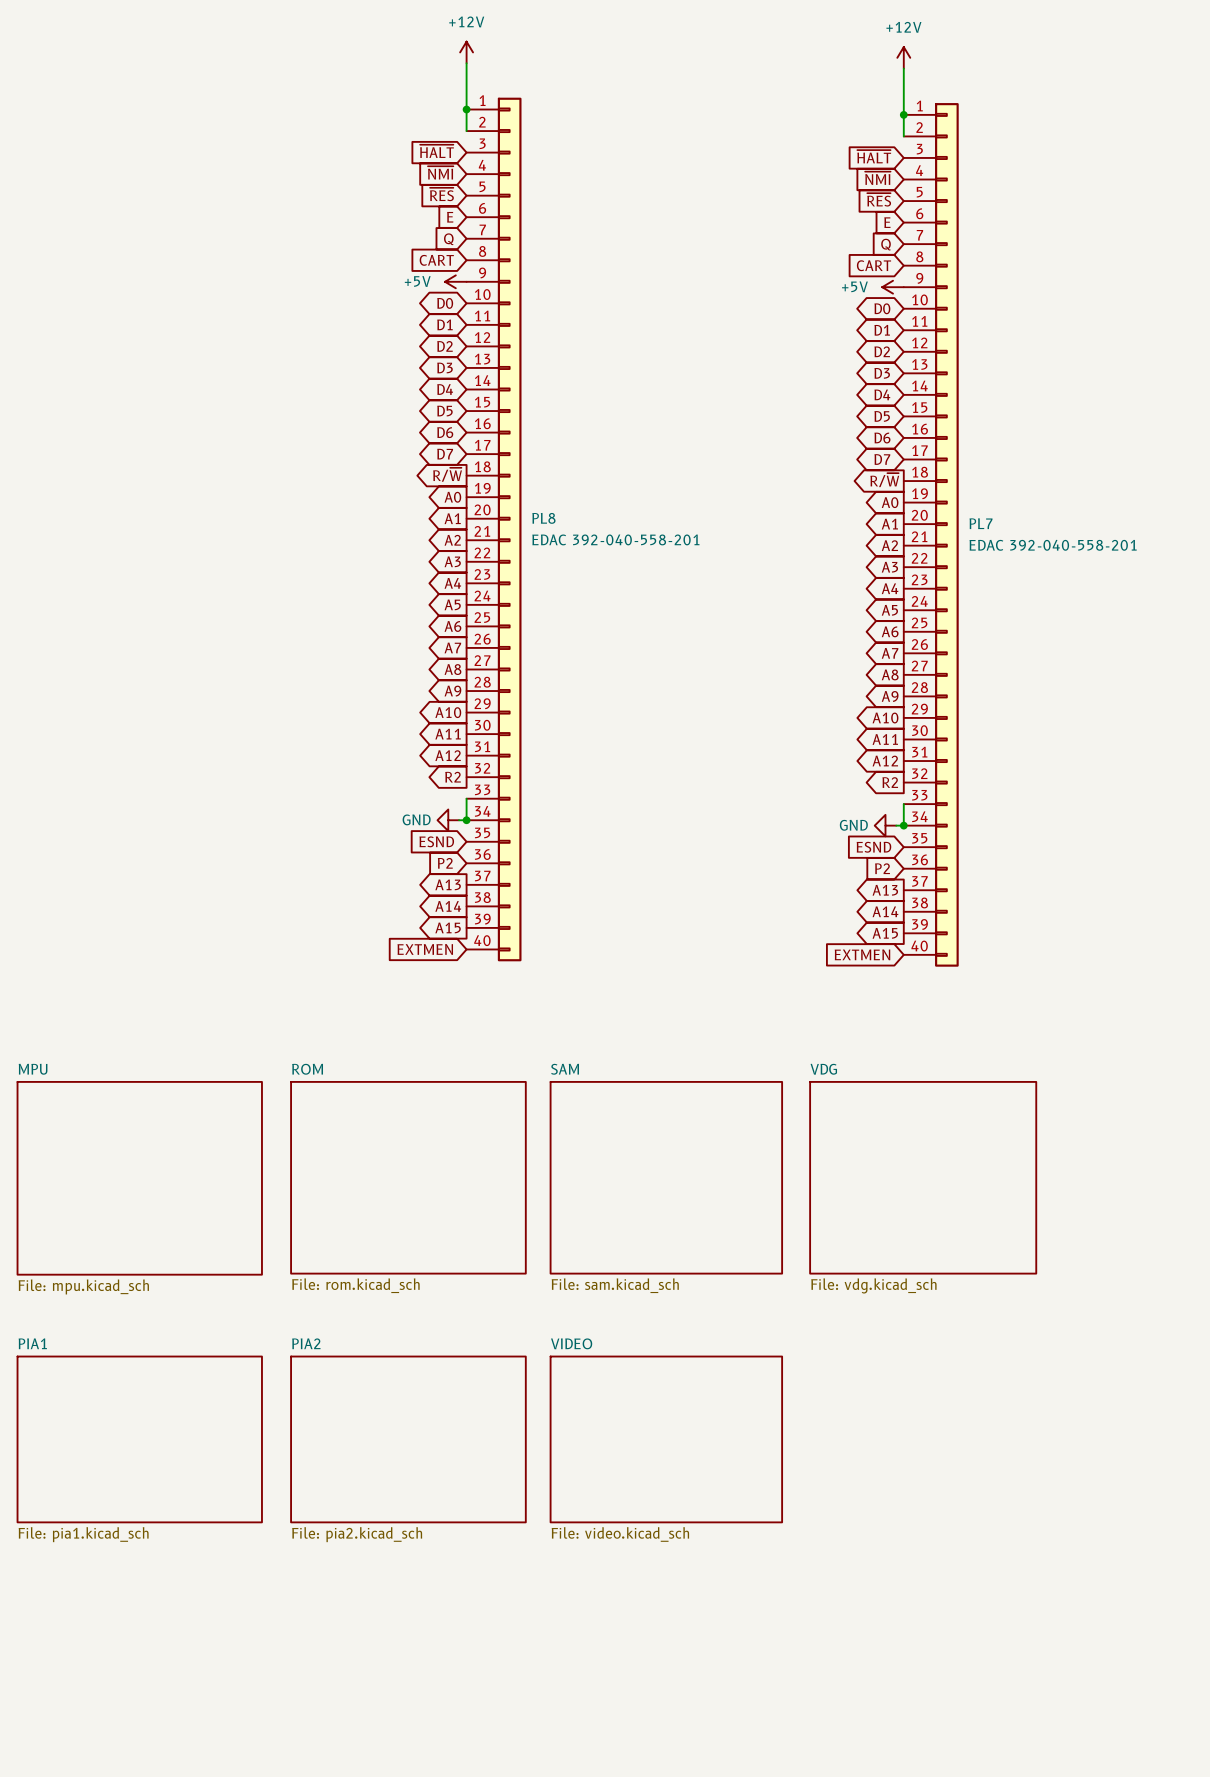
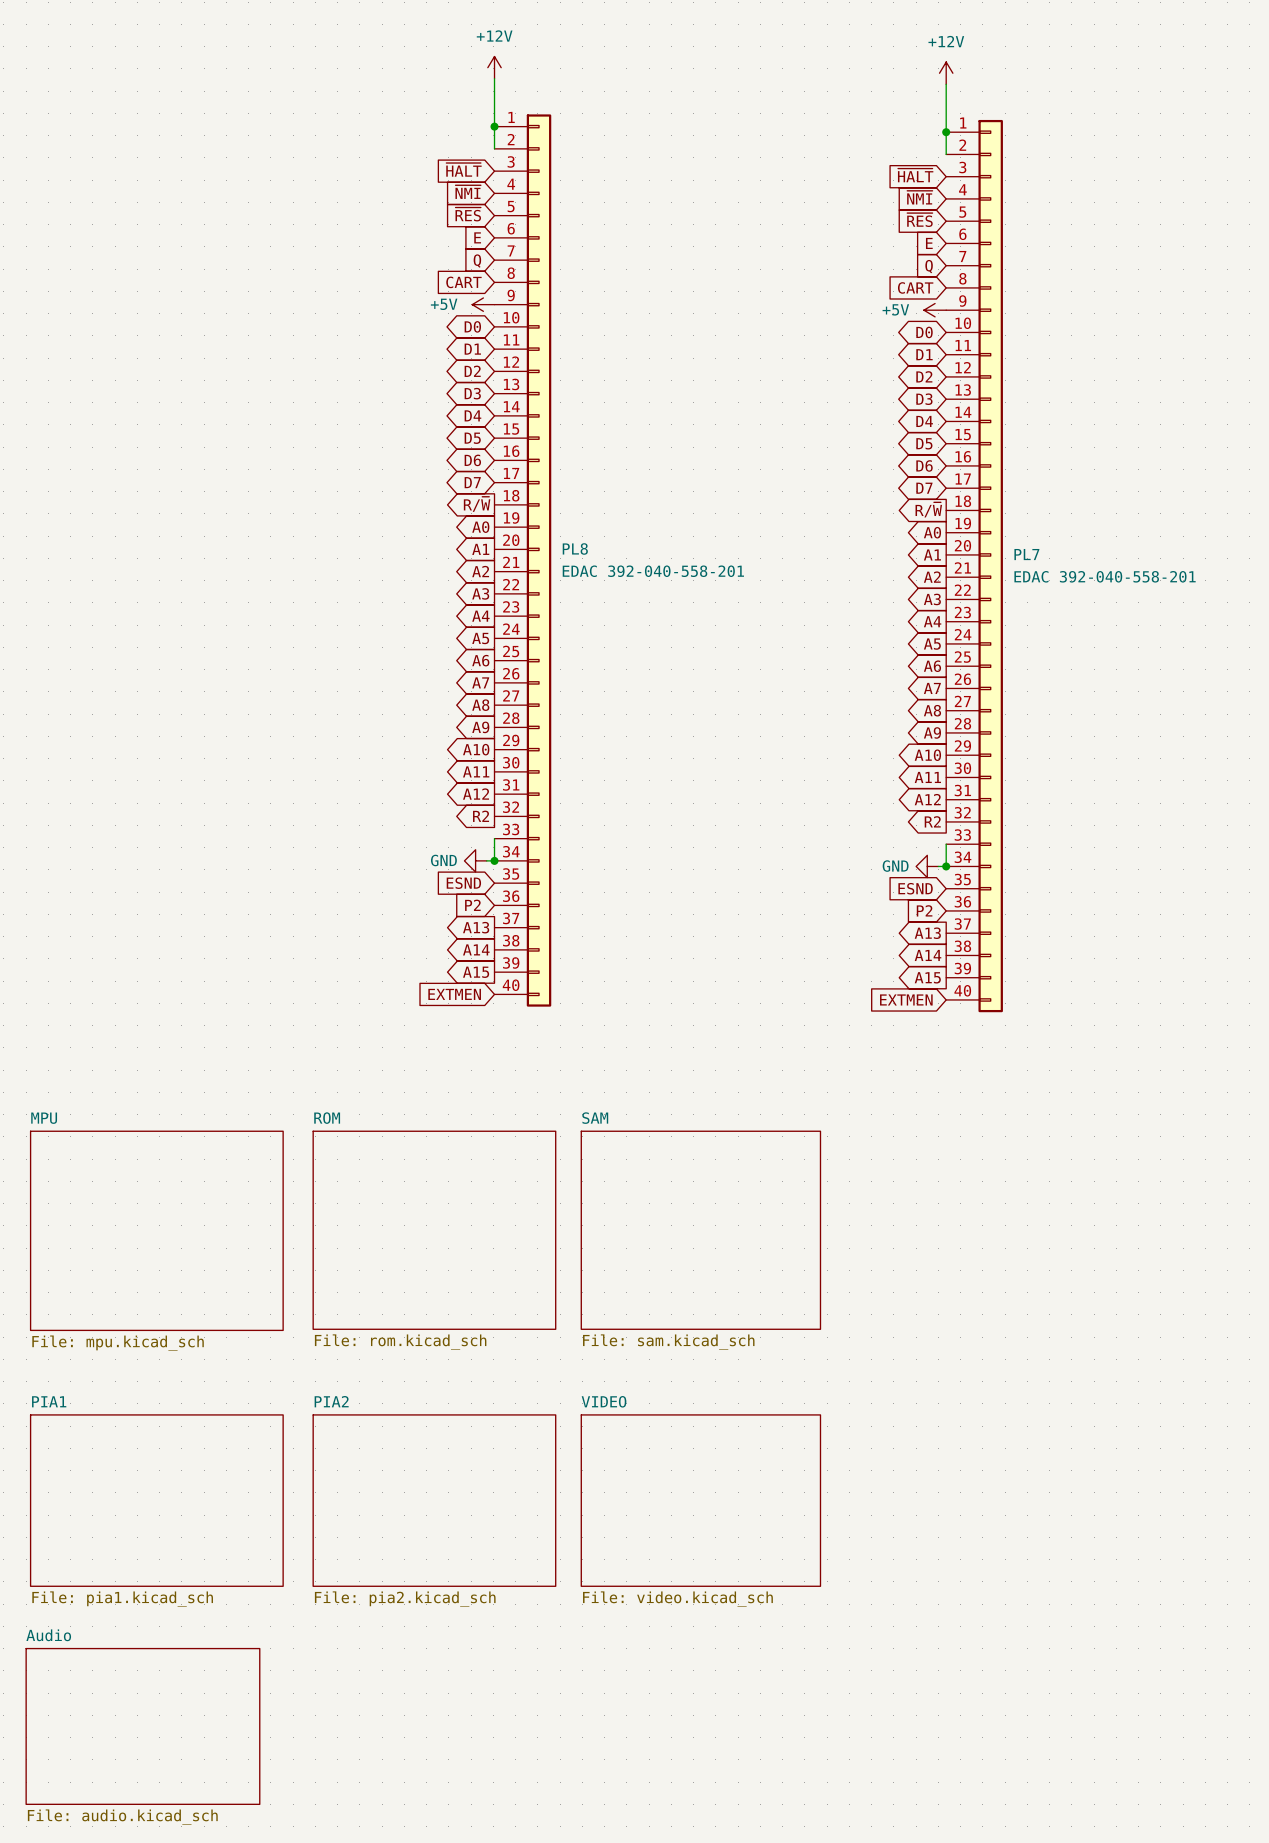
sheet VDG: File: vdg.kicad_sch (923, 1177) -> none
sheet Audio: none -> File: audio.kicad_sch (142, 1726)

